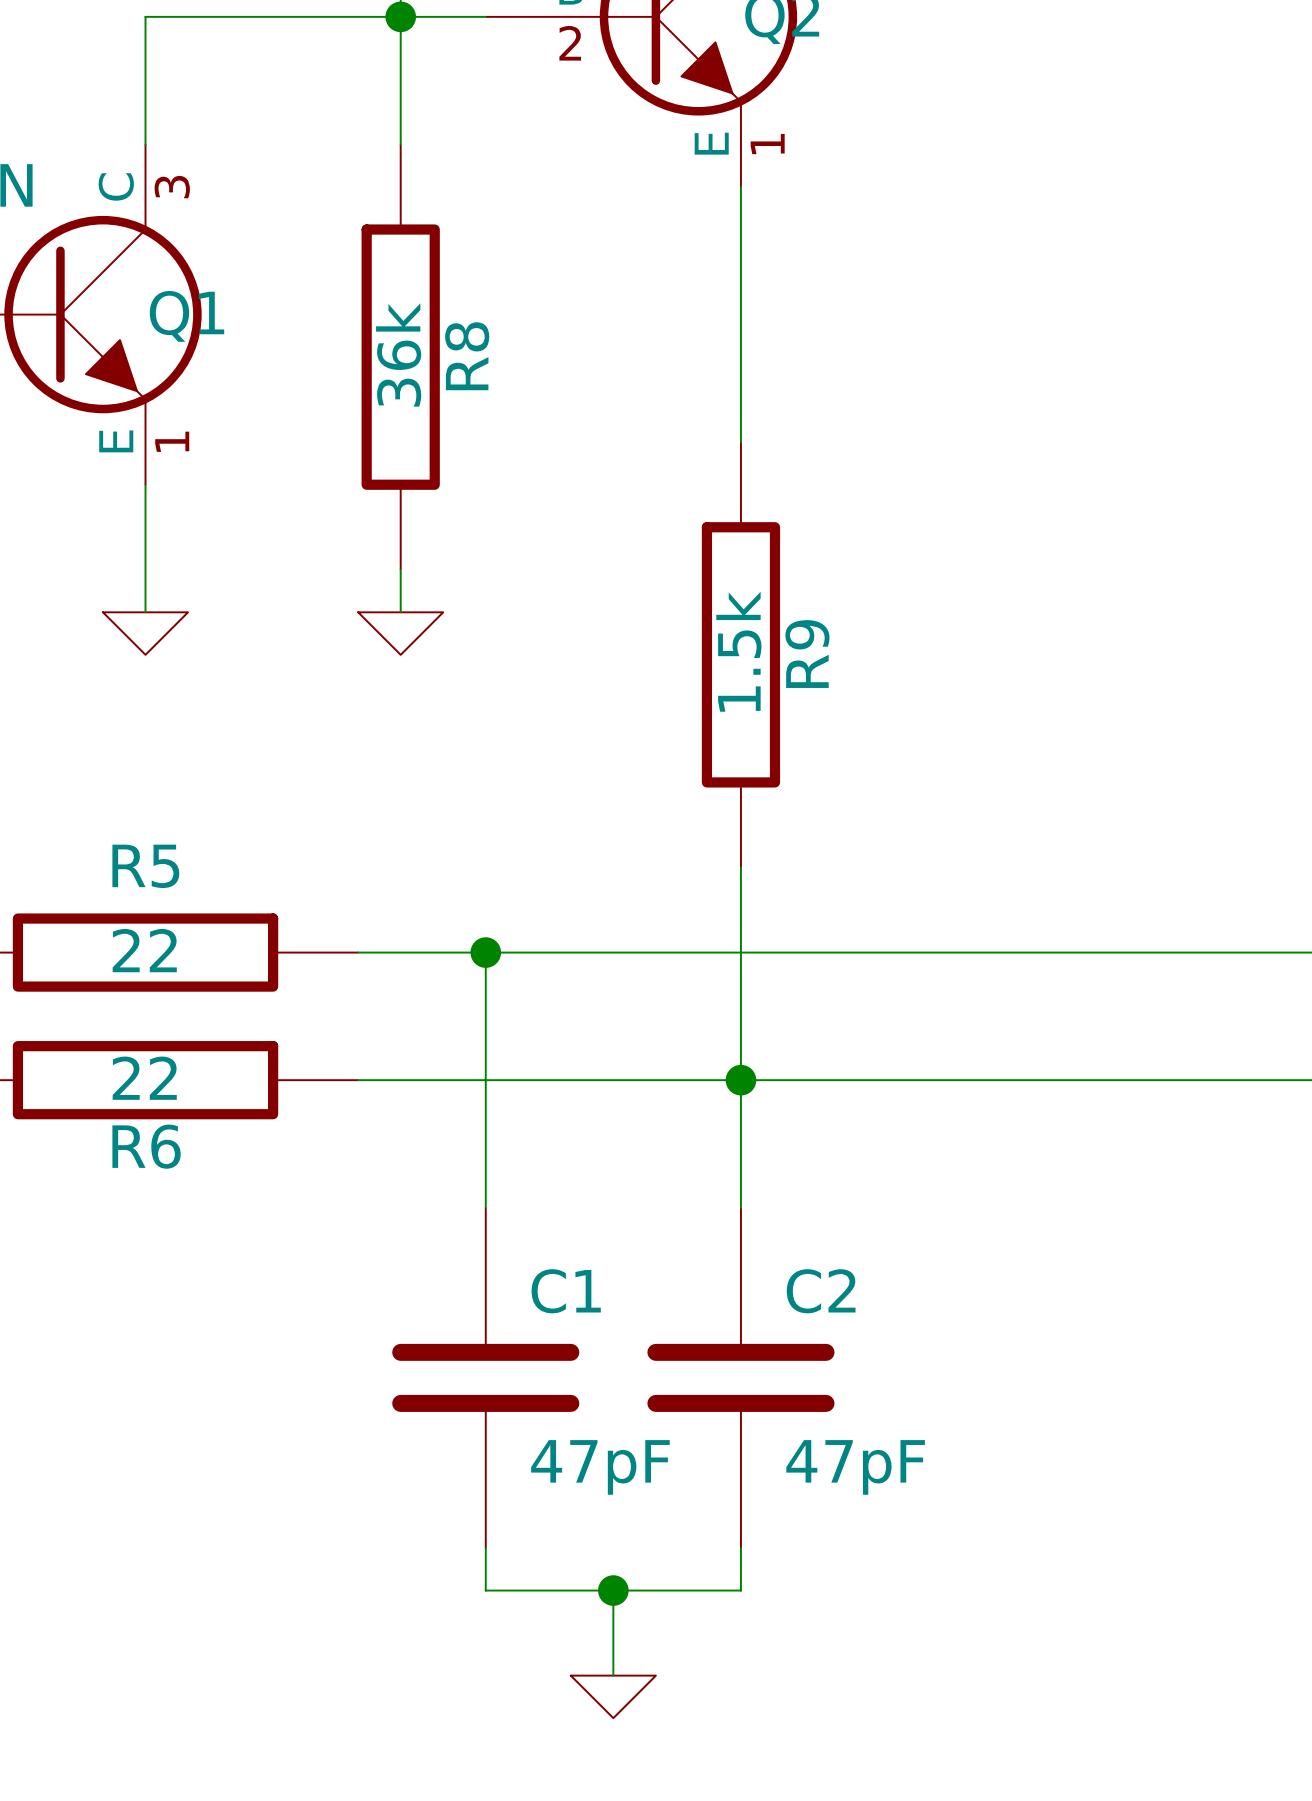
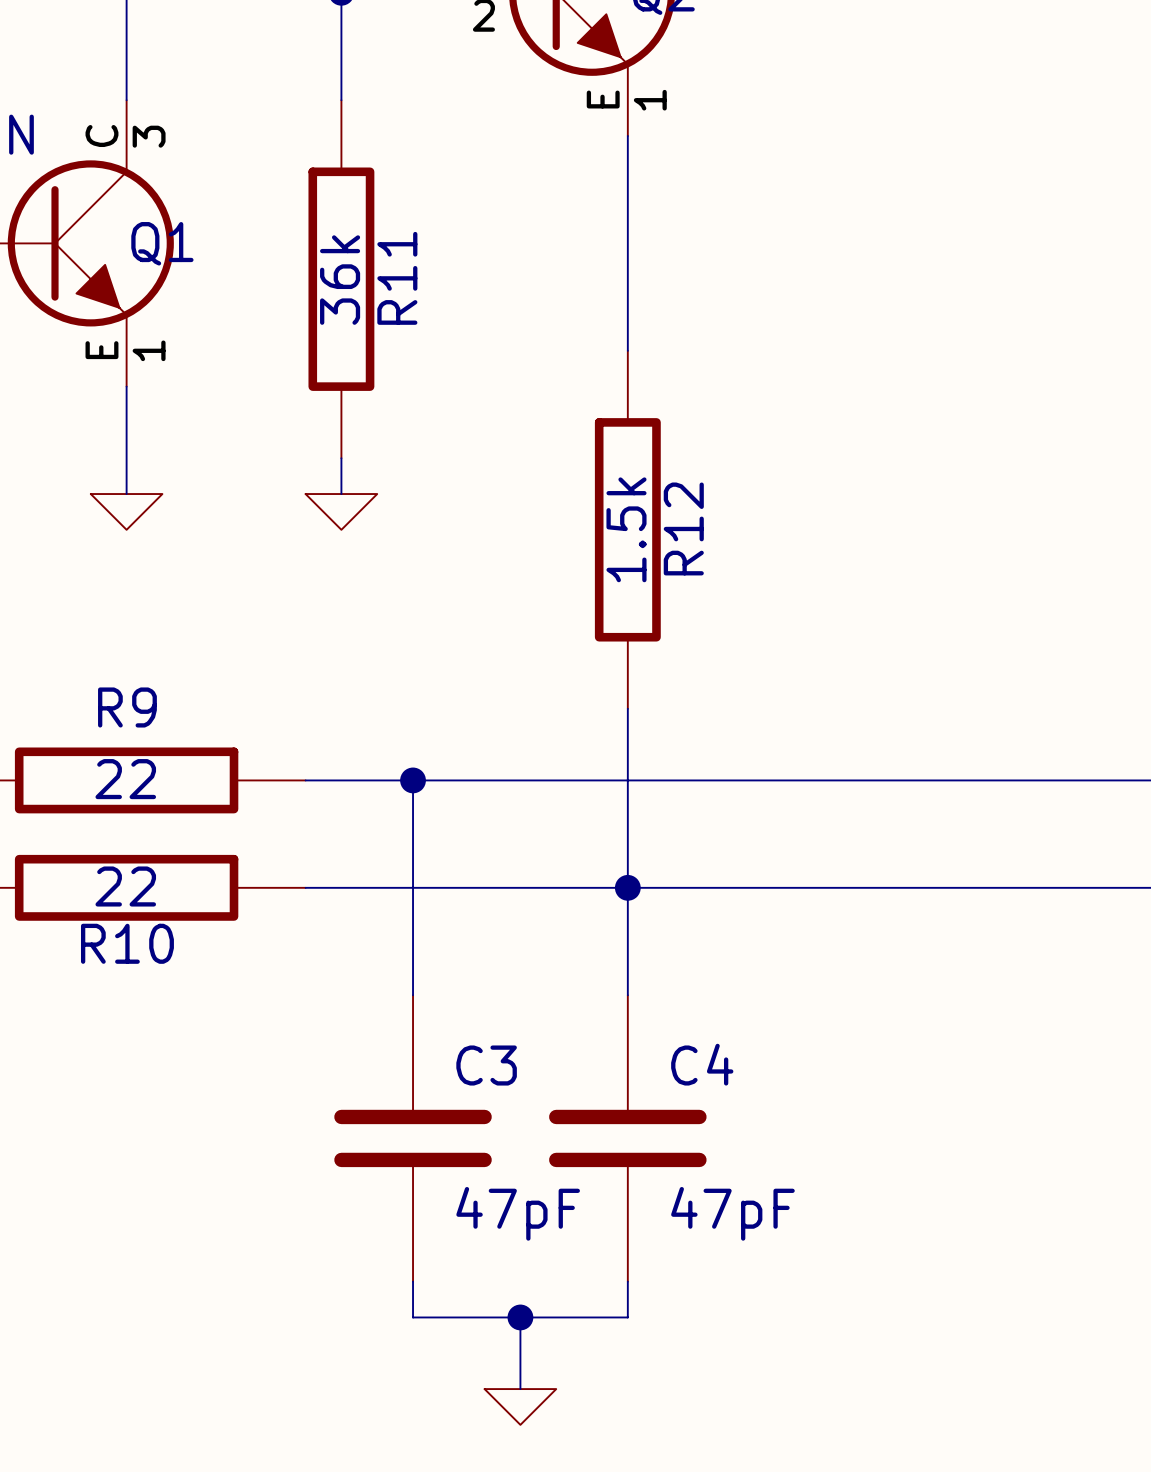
R8 name: R8 (467, 356) -> R11 (397, 278)
R9 name: R9 (807, 654) -> R12 (683, 528)
R5 name: R5 (145, 866) -> R9 (127, 707)
R6 name: R6 (146, 1146) -> R10 (127, 943)
C1 name: C1 (566, 1291) -> C3 (486, 1065)
C2 name: C2 (821, 1291) -> C4 (702, 1064)

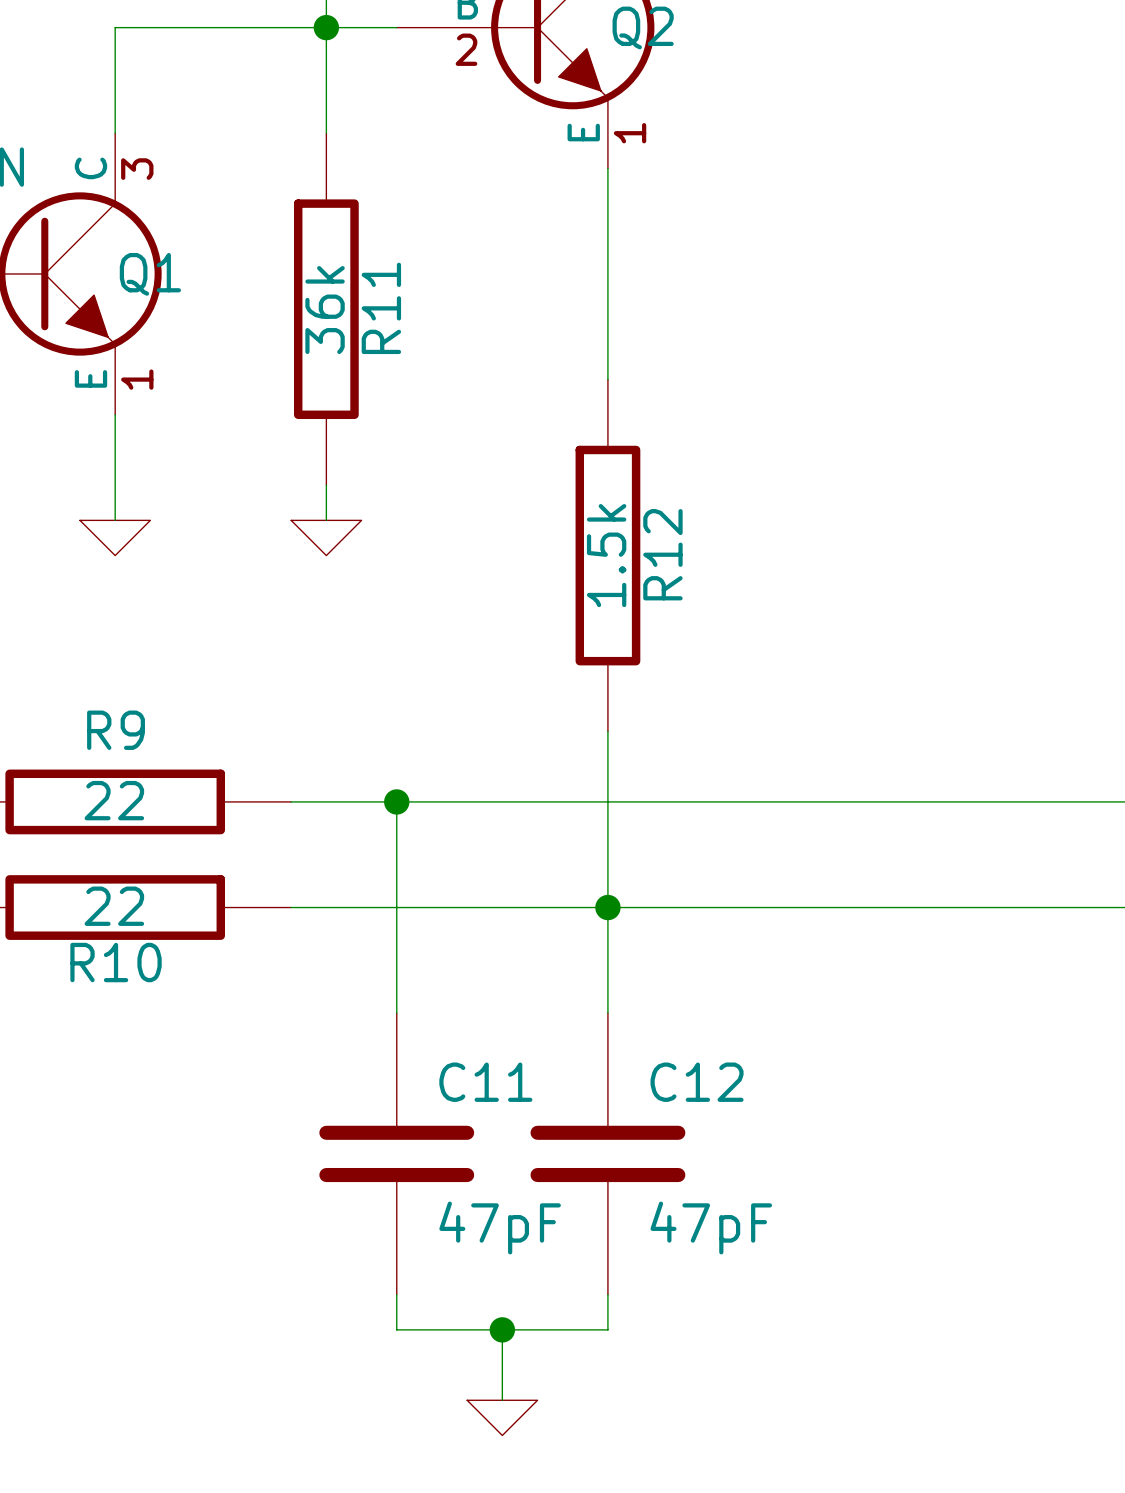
C4 name: C4 (702, 1064) -> C12 (697, 1082)
C3 name: C3 (486, 1065) -> C11 (485, 1082)

